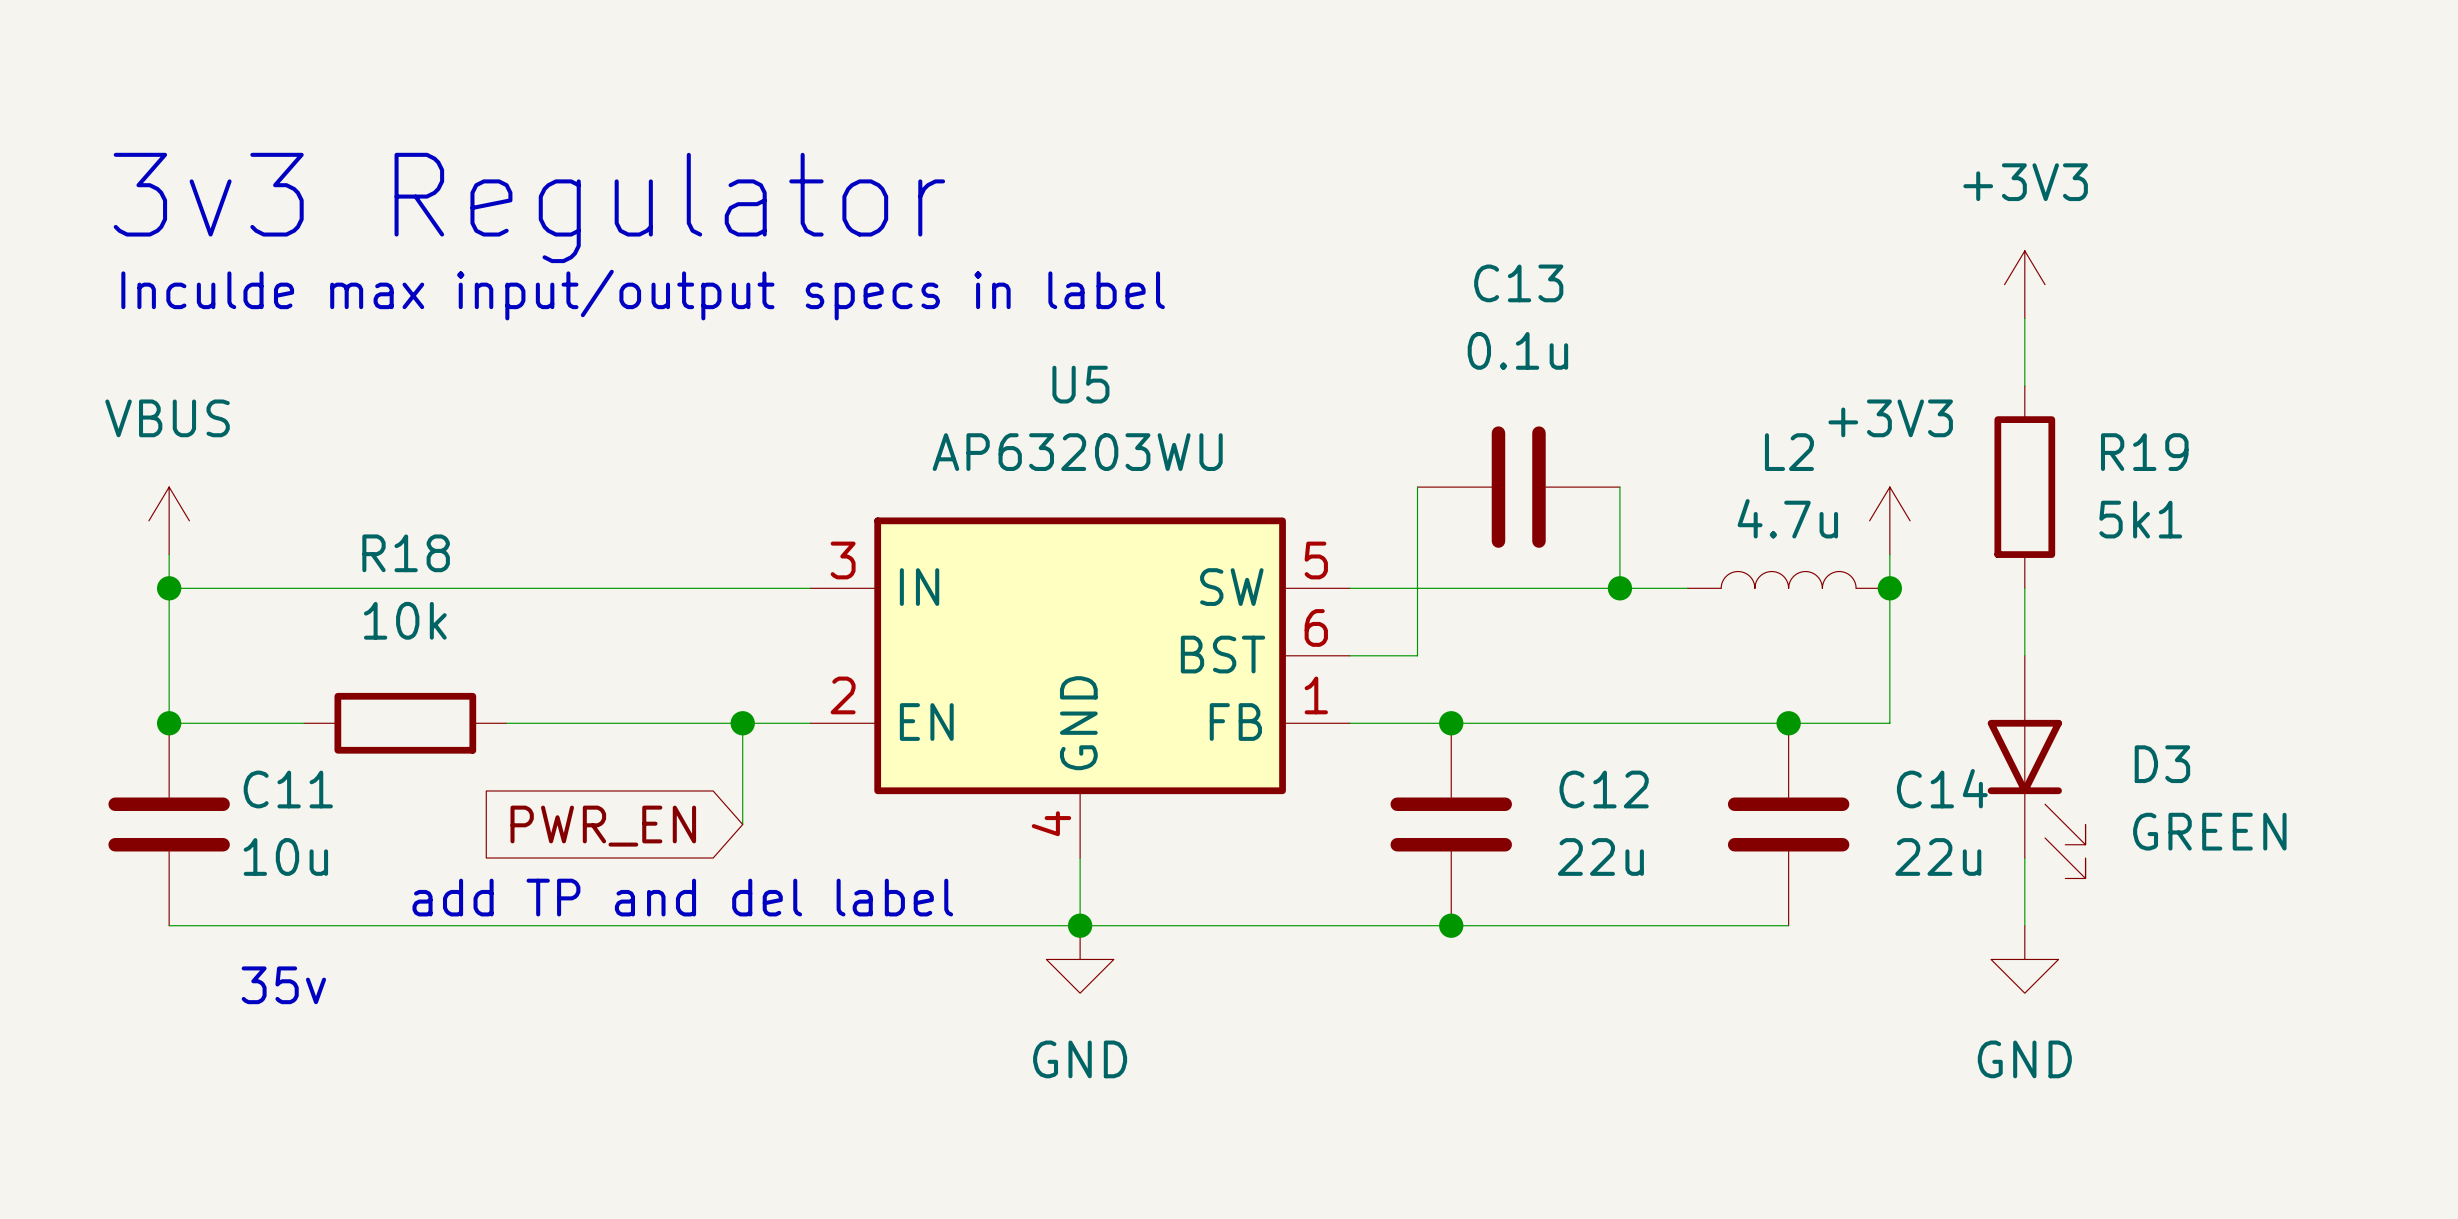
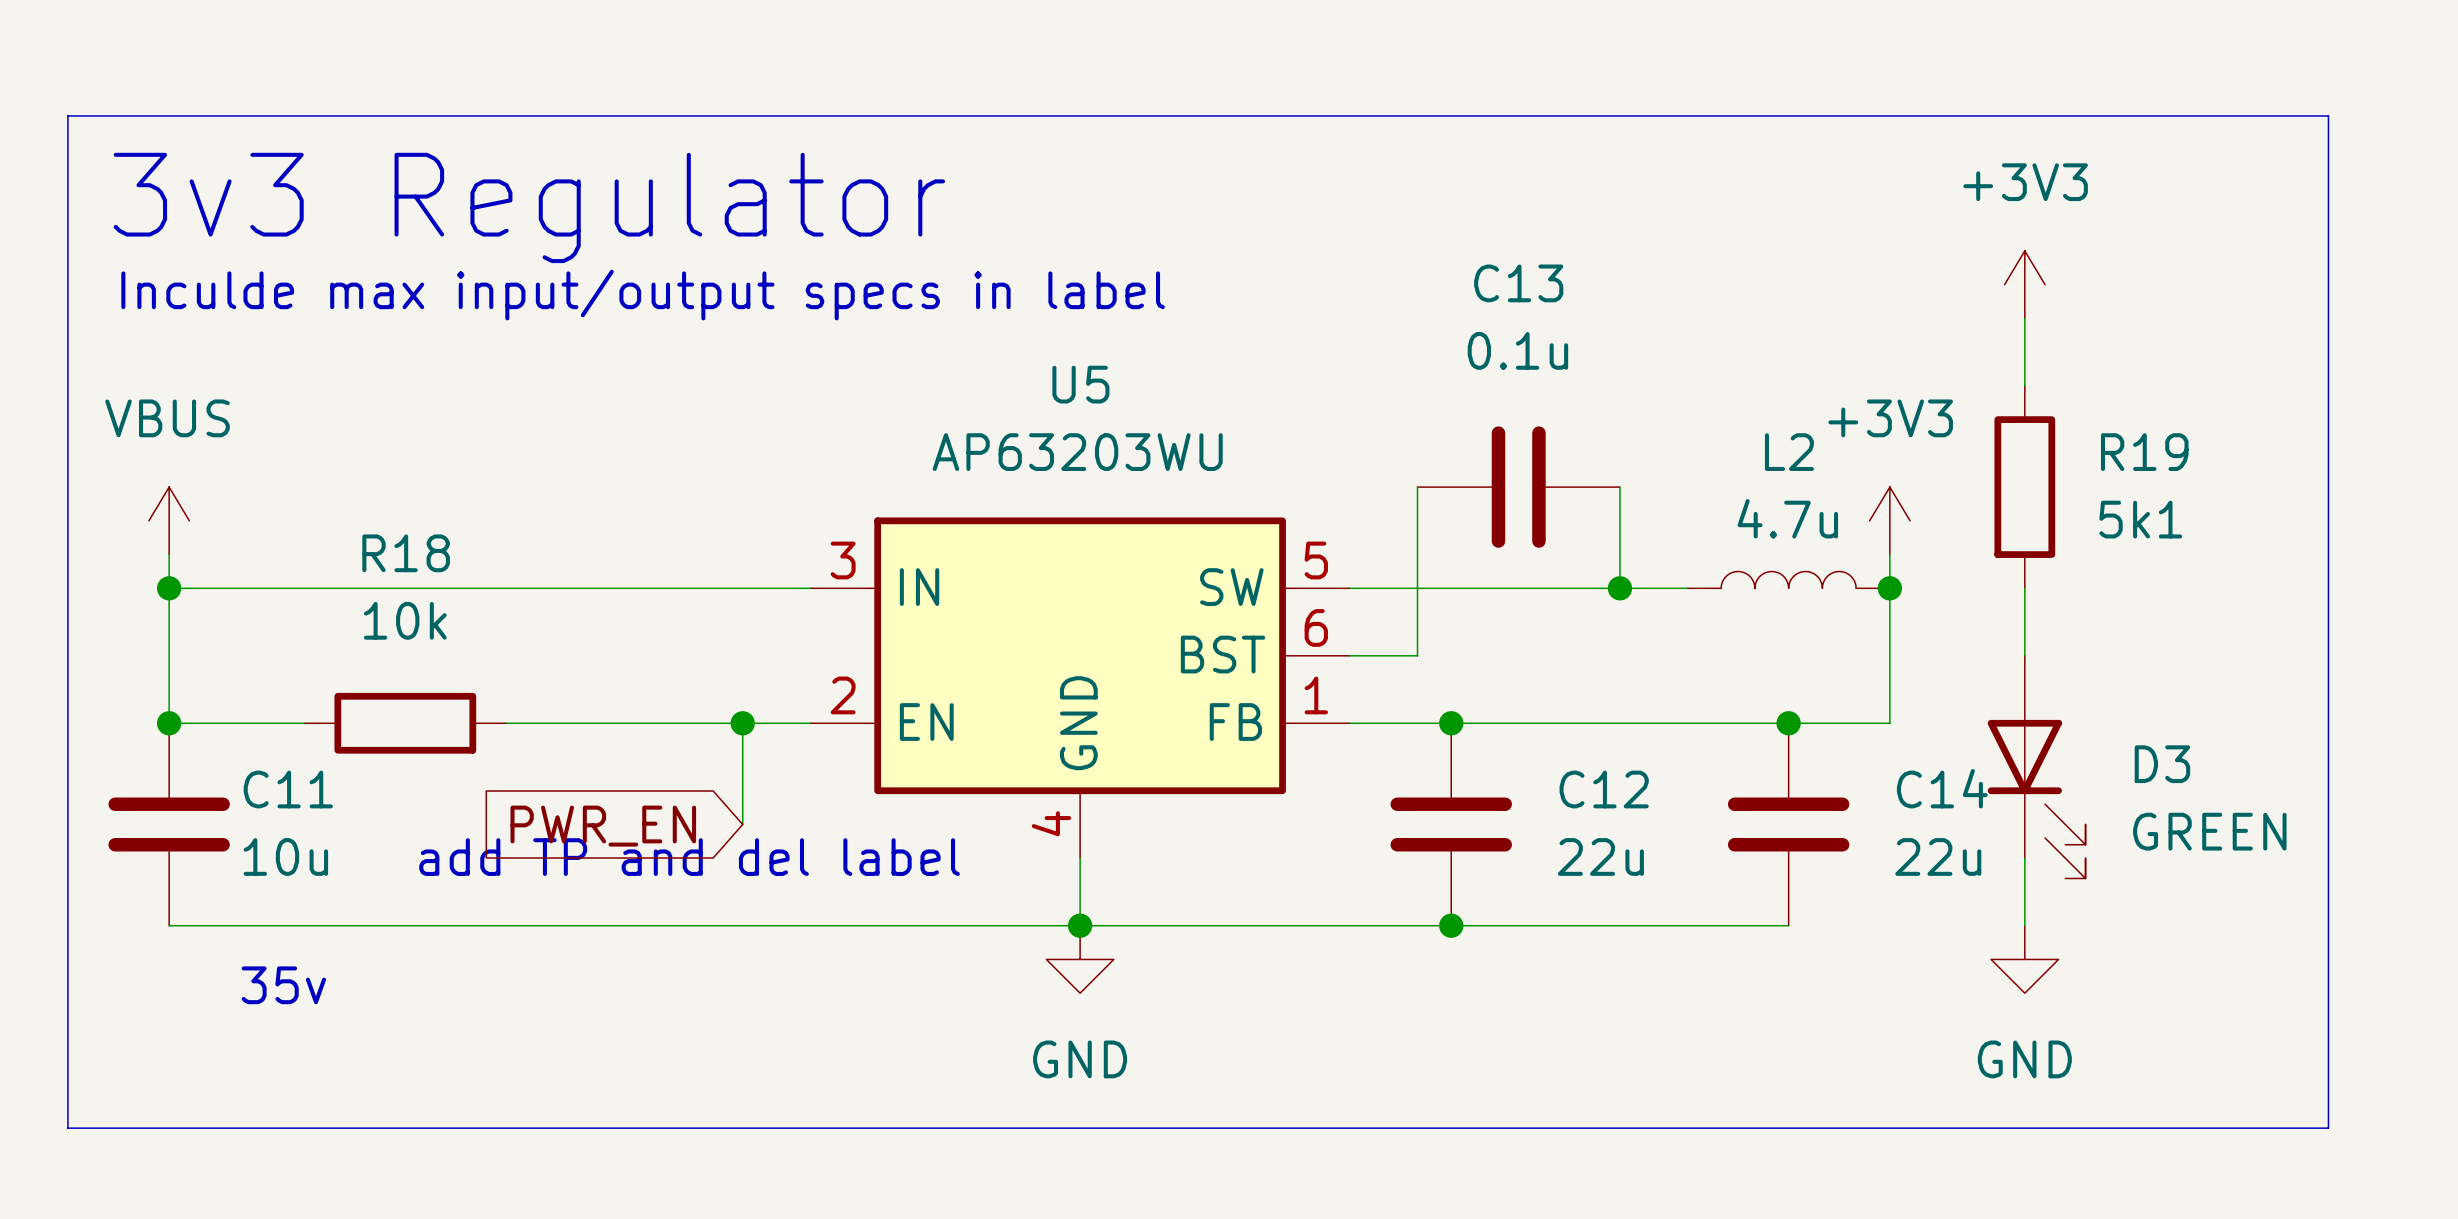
line: none -> (67, 115) (2328, 115) (2328, 1128) (67, 1128) (67, 115)
text position: add TP and del label (682, 897) -> add TP and del label (689, 857)

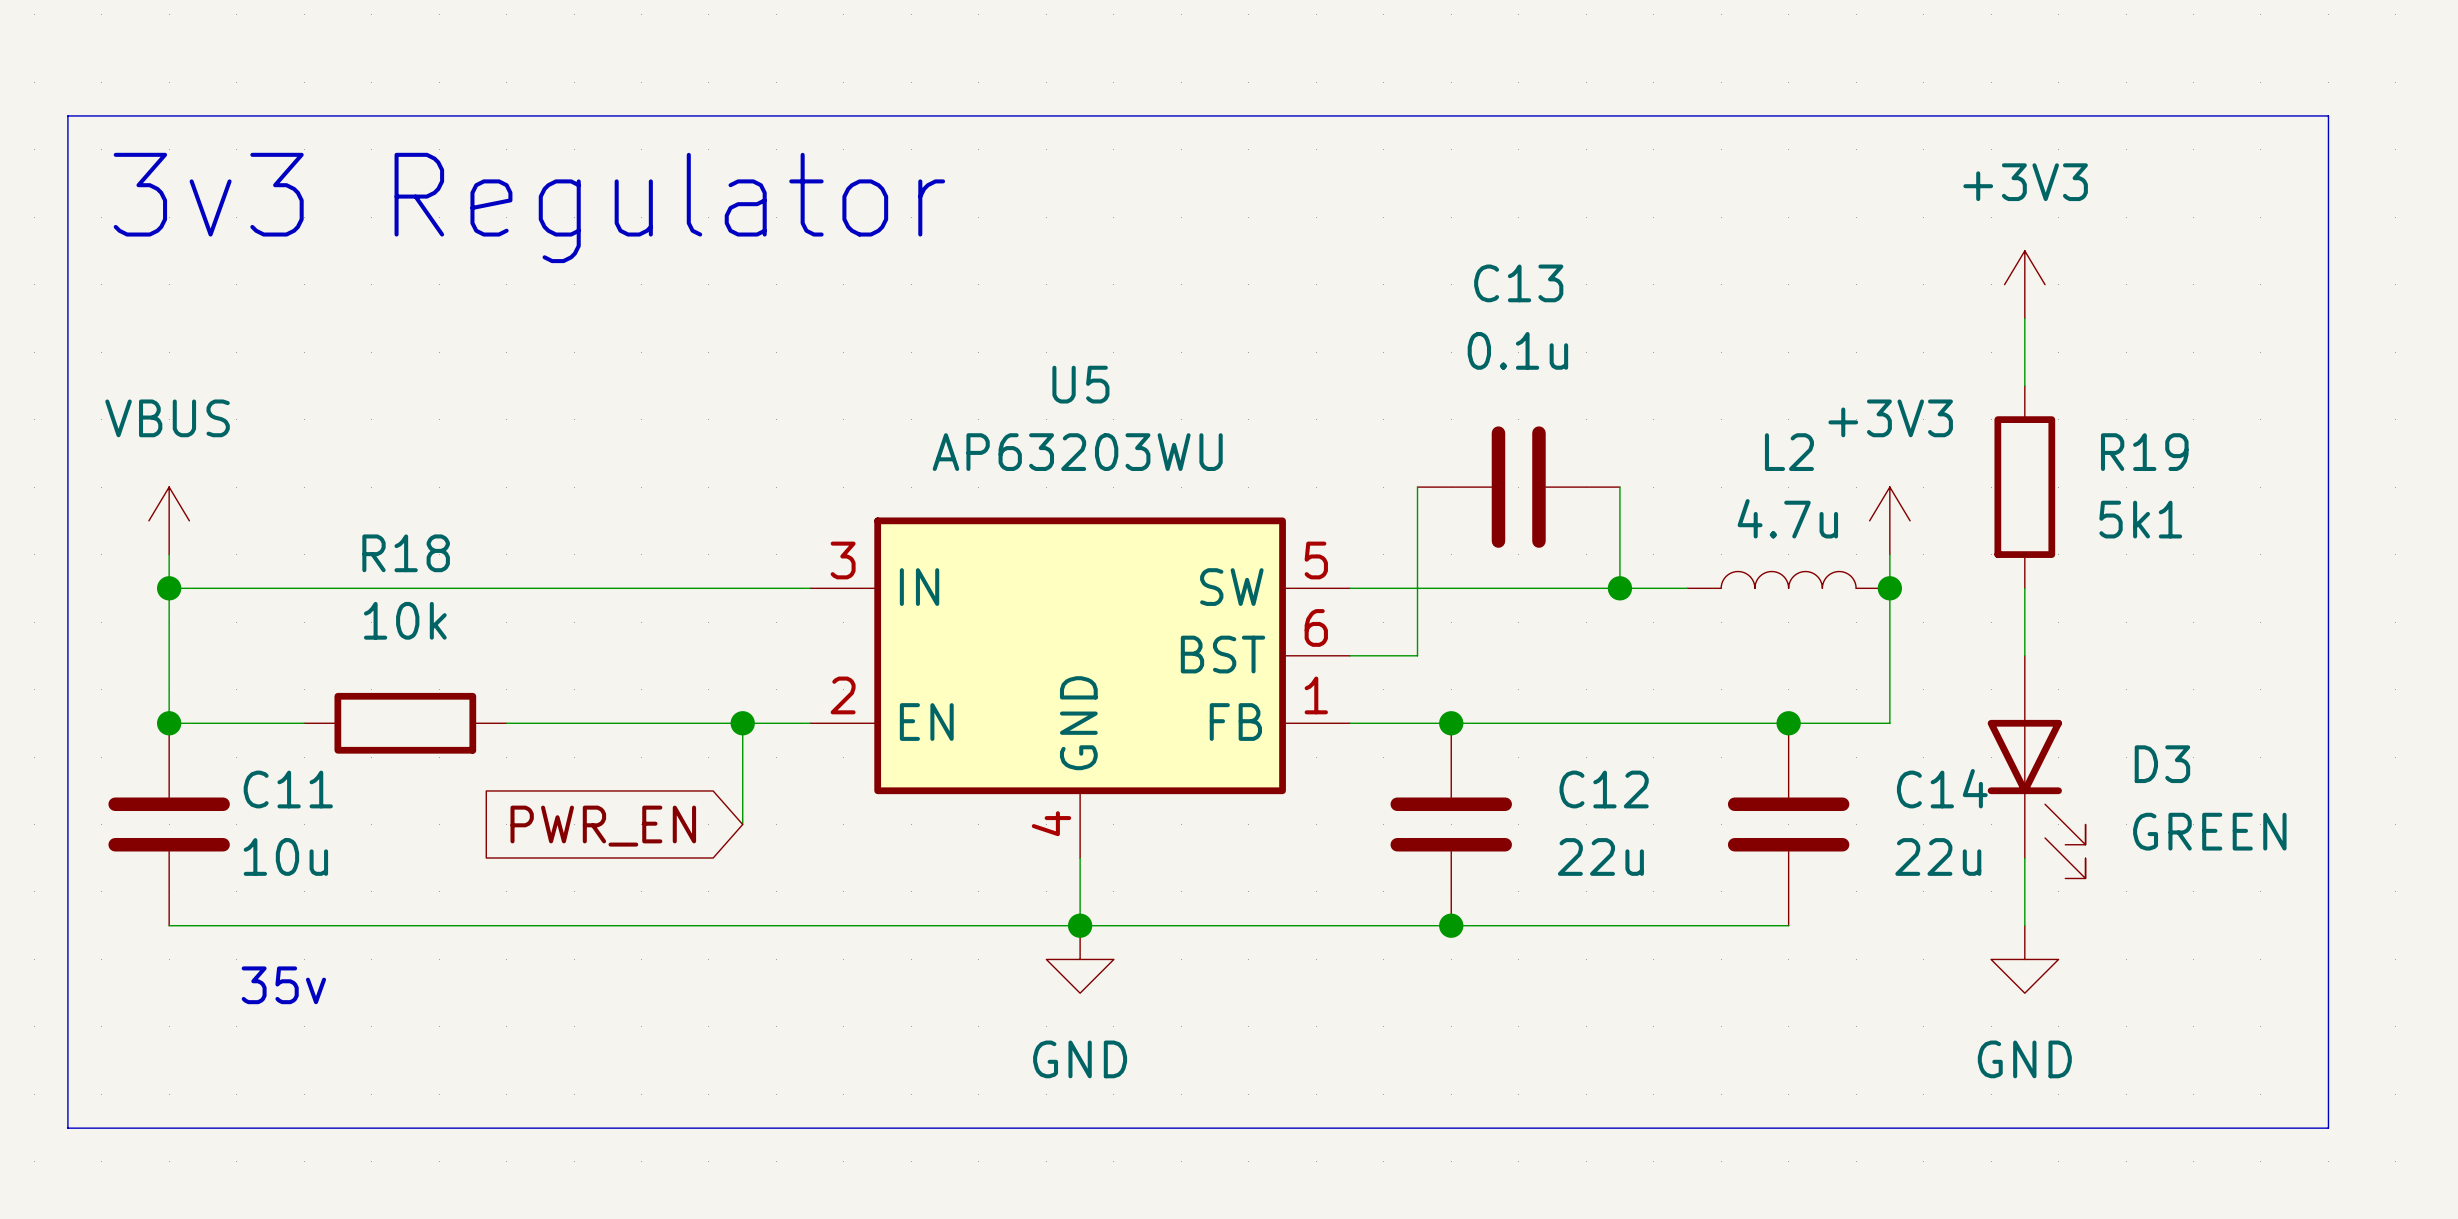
text: Inculde max input/output specs in label (643, 295) -> none
text: add TP and del label (689, 857) -> none

